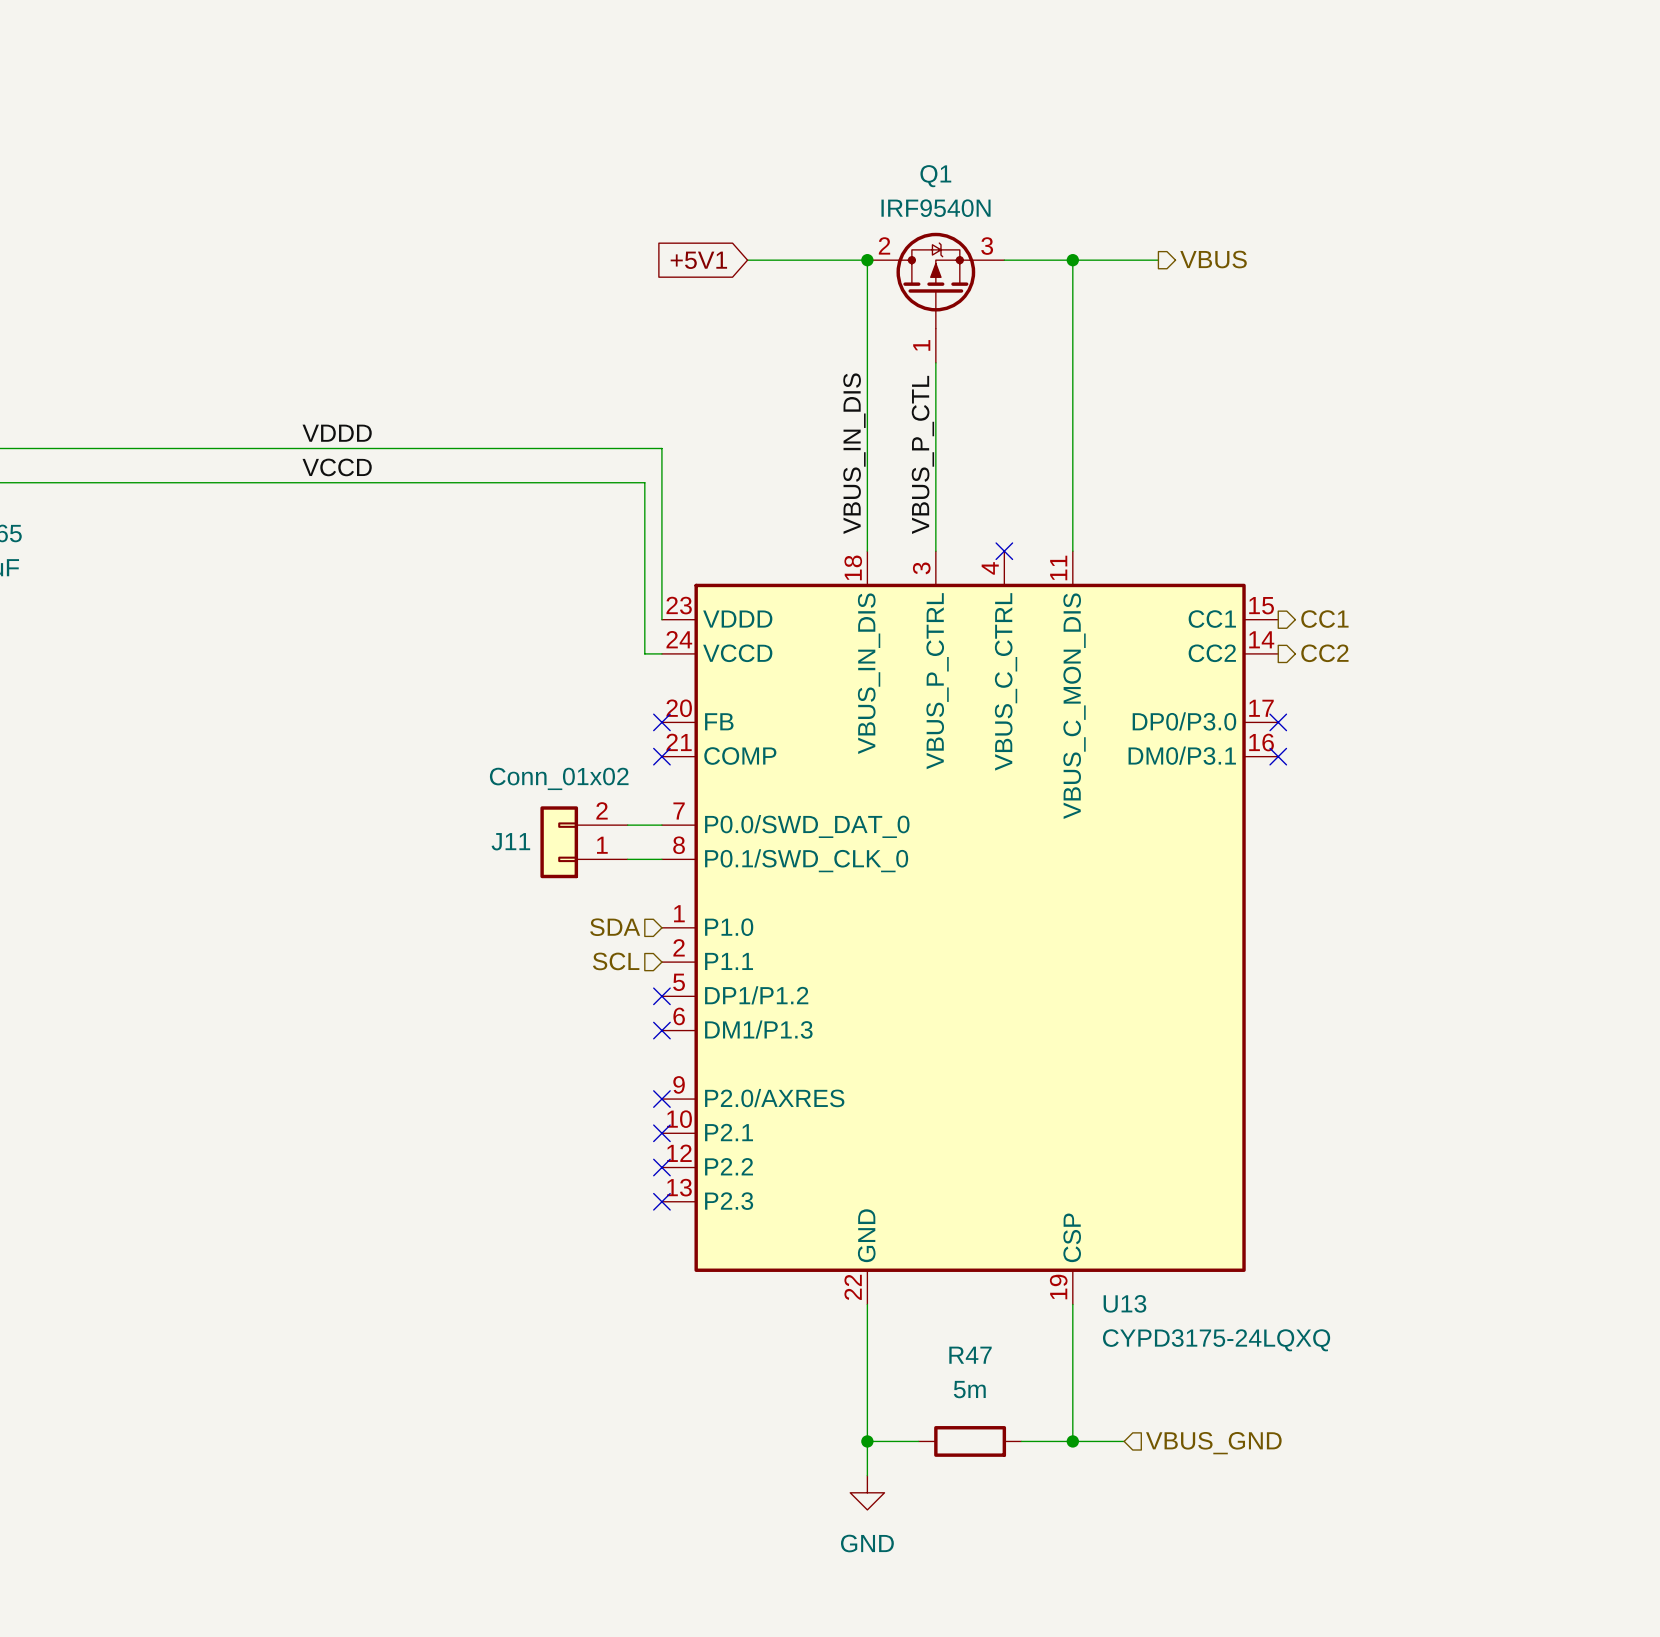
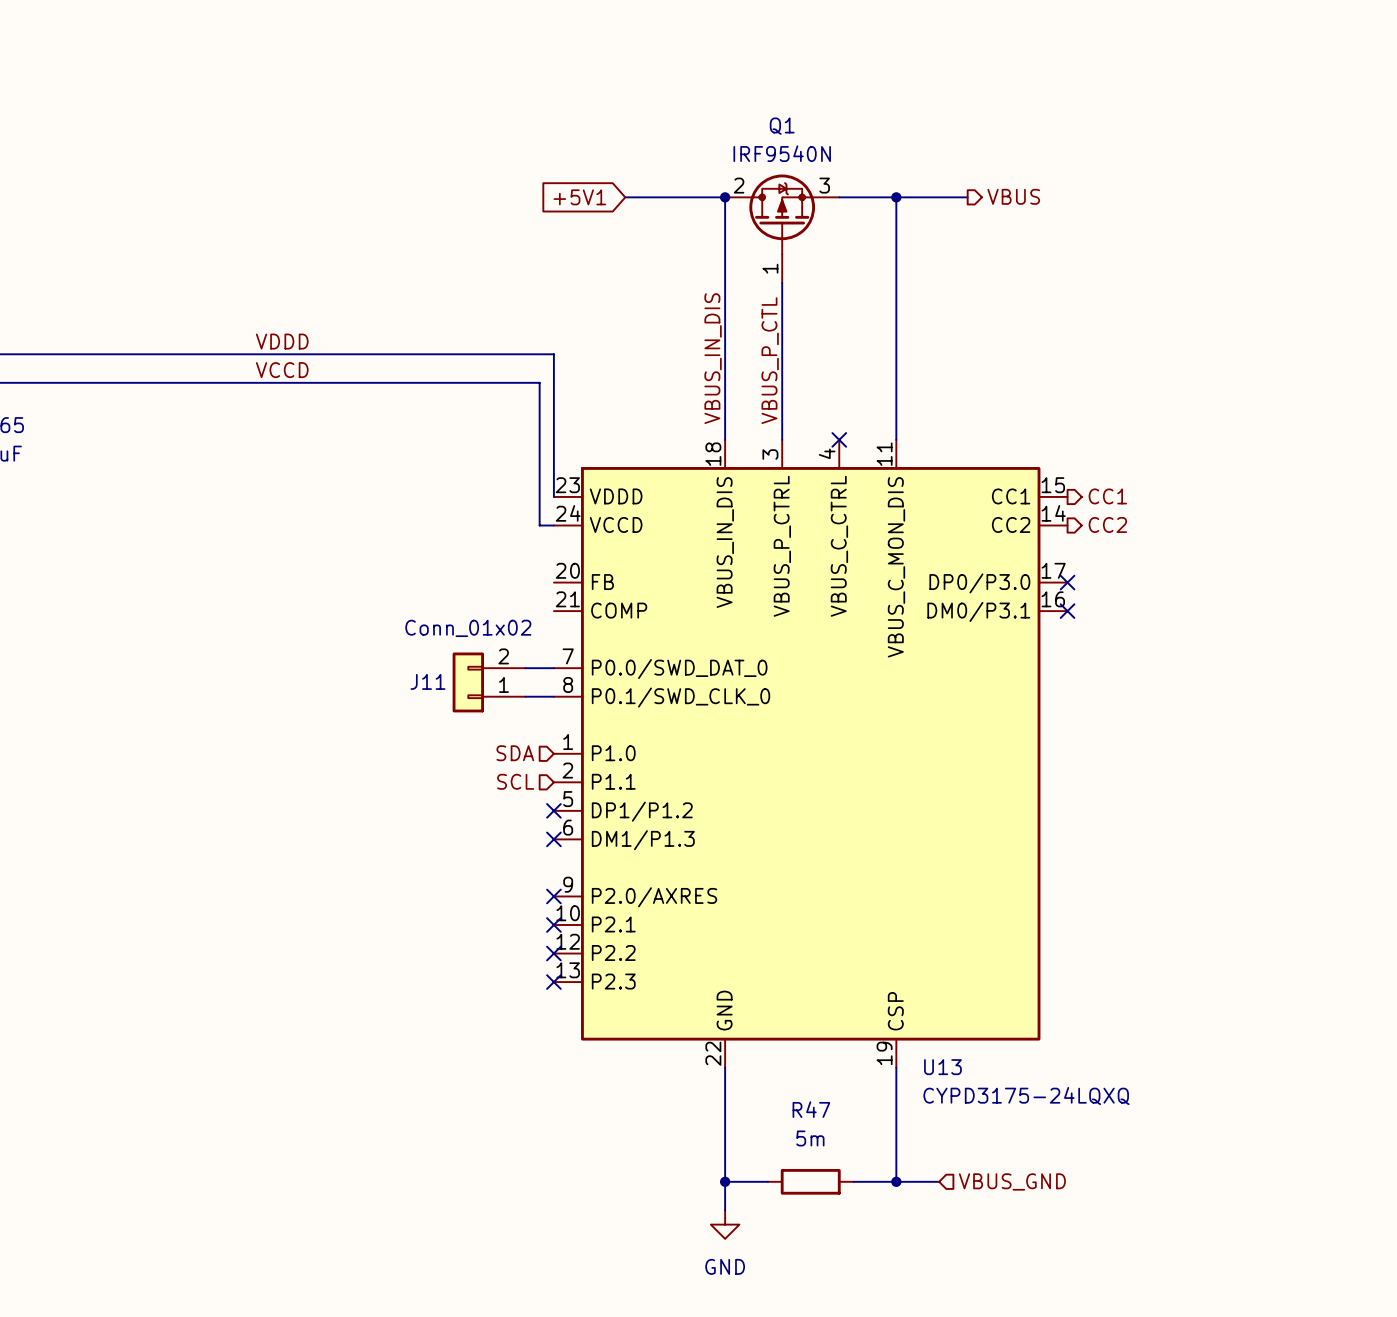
no-connect mark: (661, 722) -> none
no-connect mark: (661, 756) -> none

